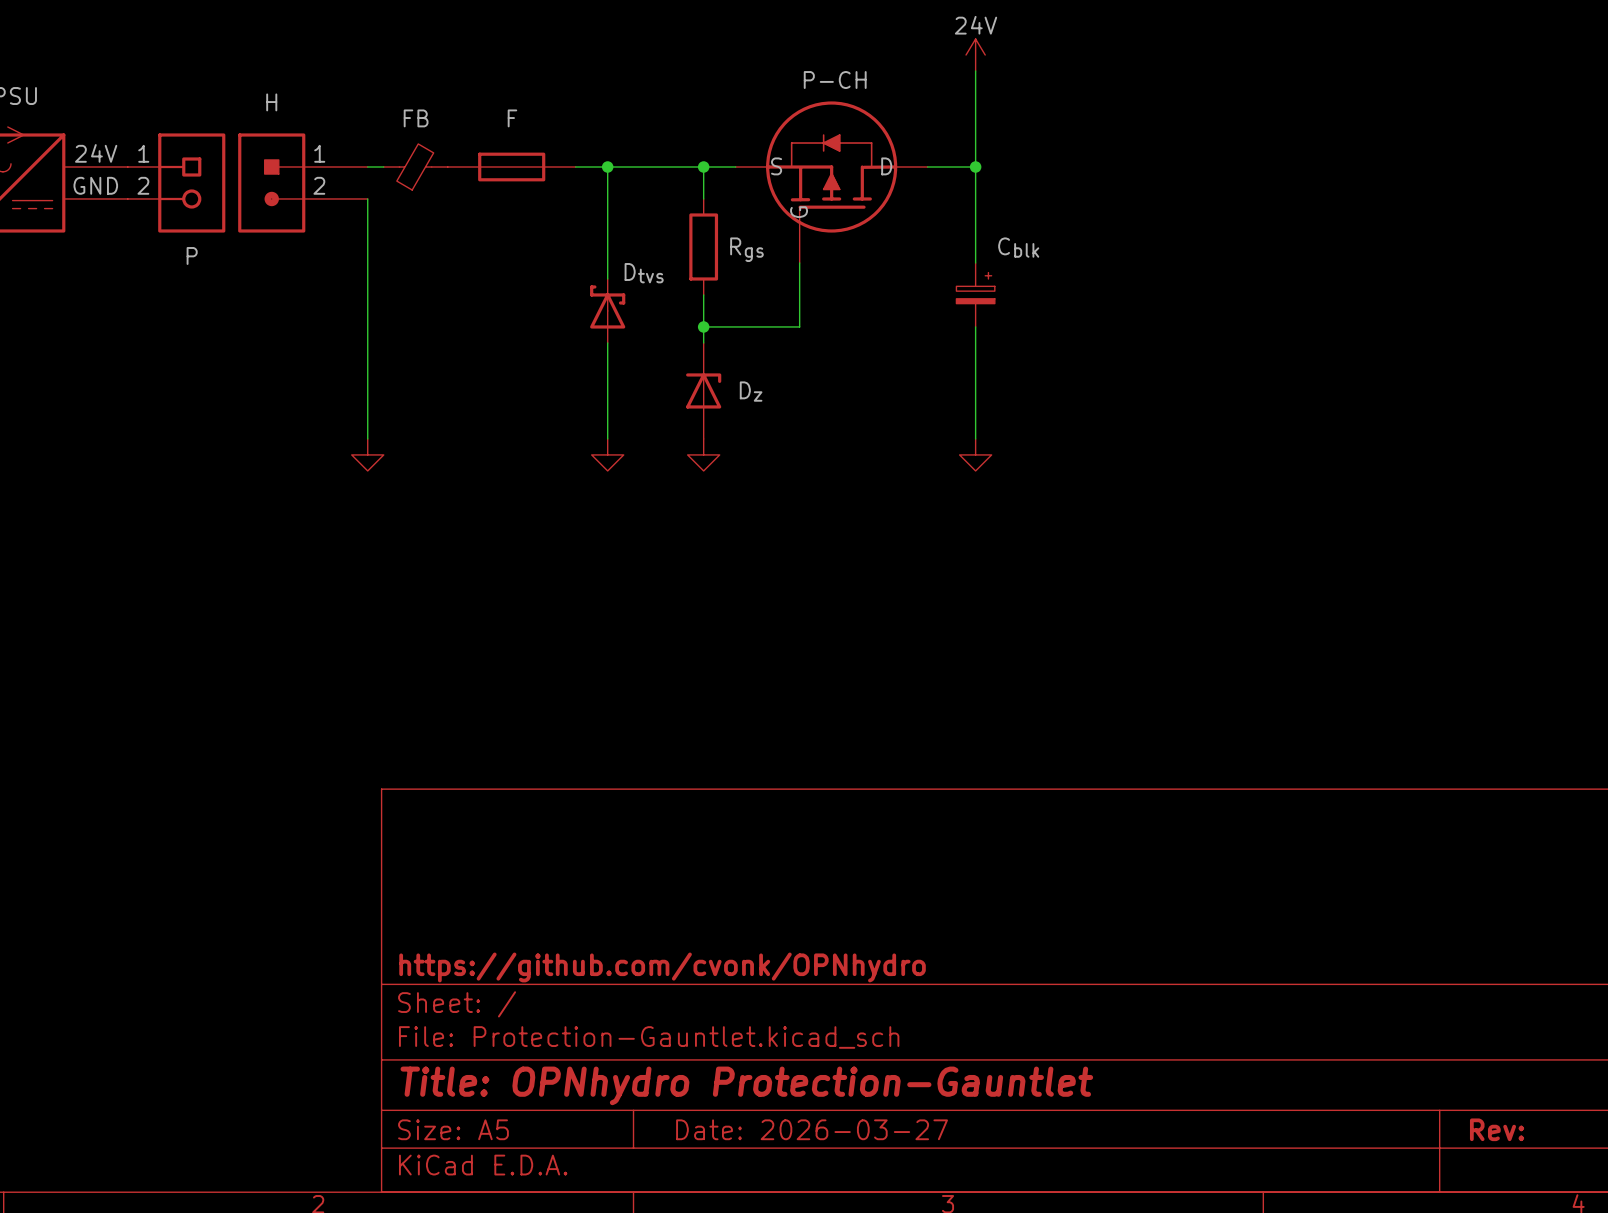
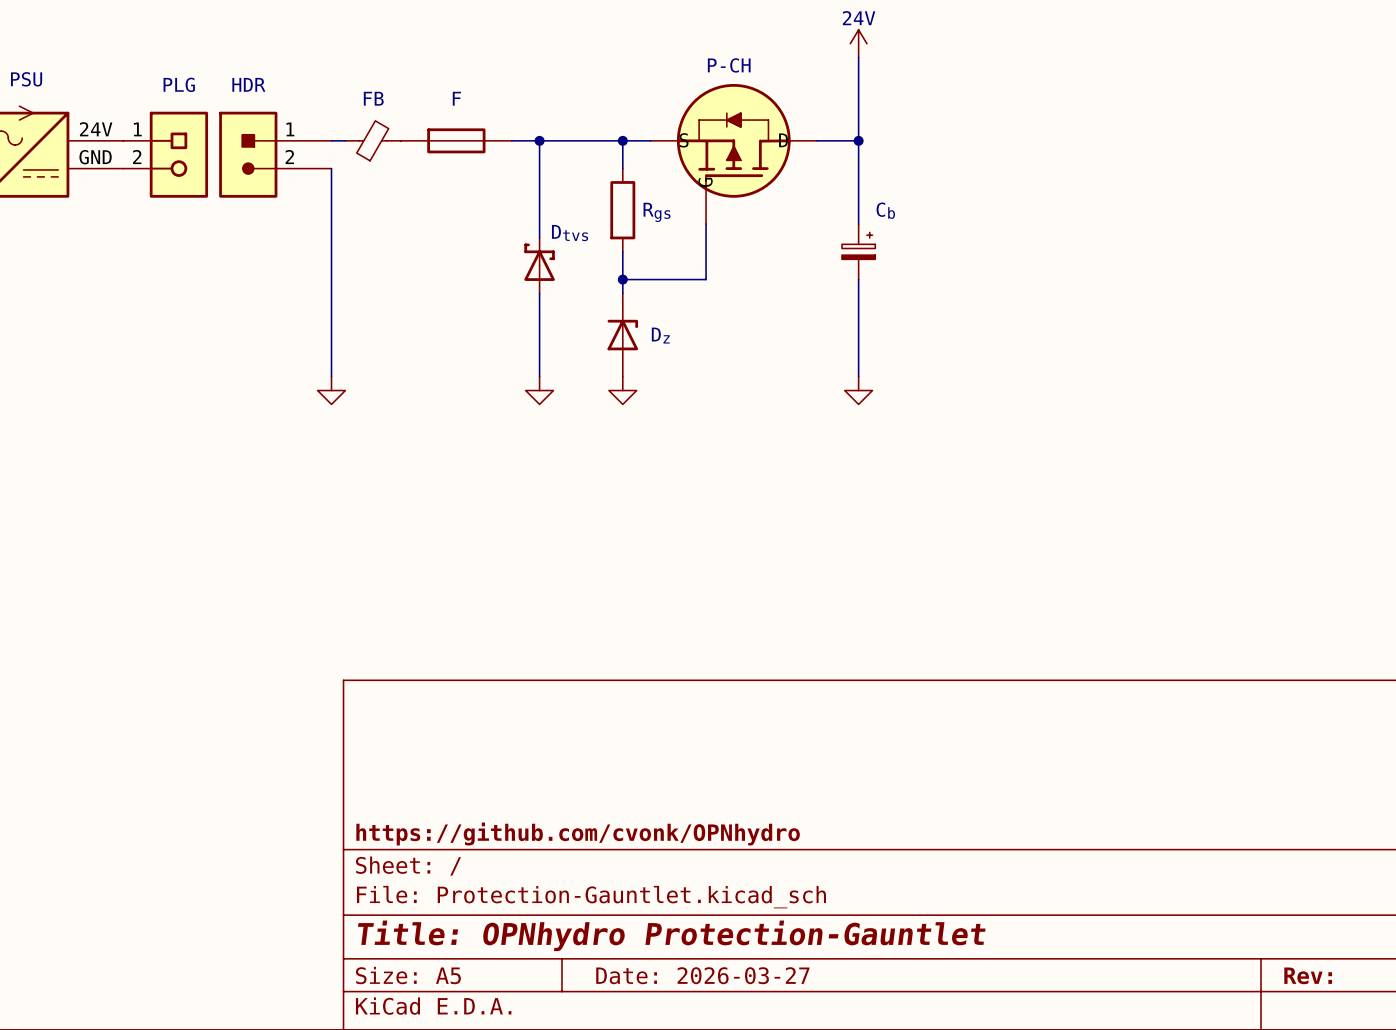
H name: H (271, 102) -> HDR (248, 84)
Cblk name: Cblk (1018, 247) -> Cb (885, 210)
P name: P (192, 255) -> PLG (179, 84)

